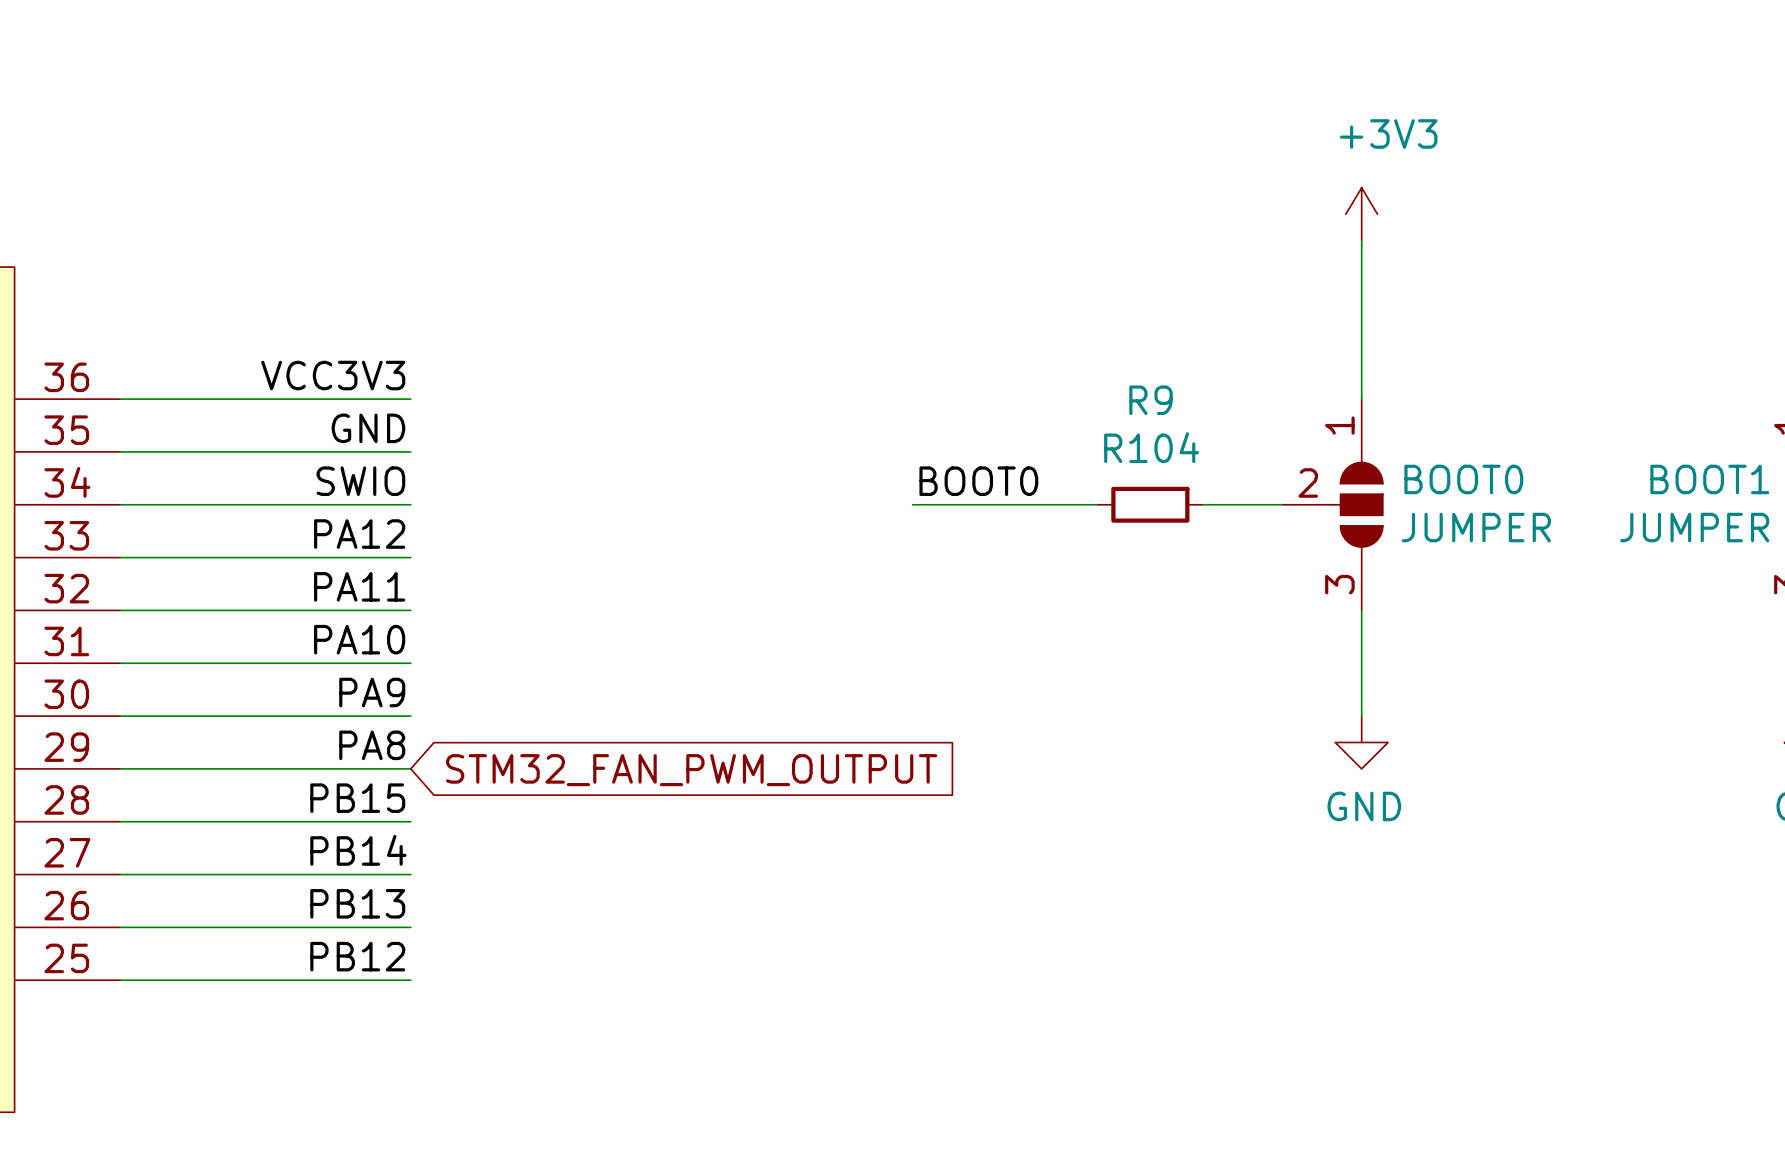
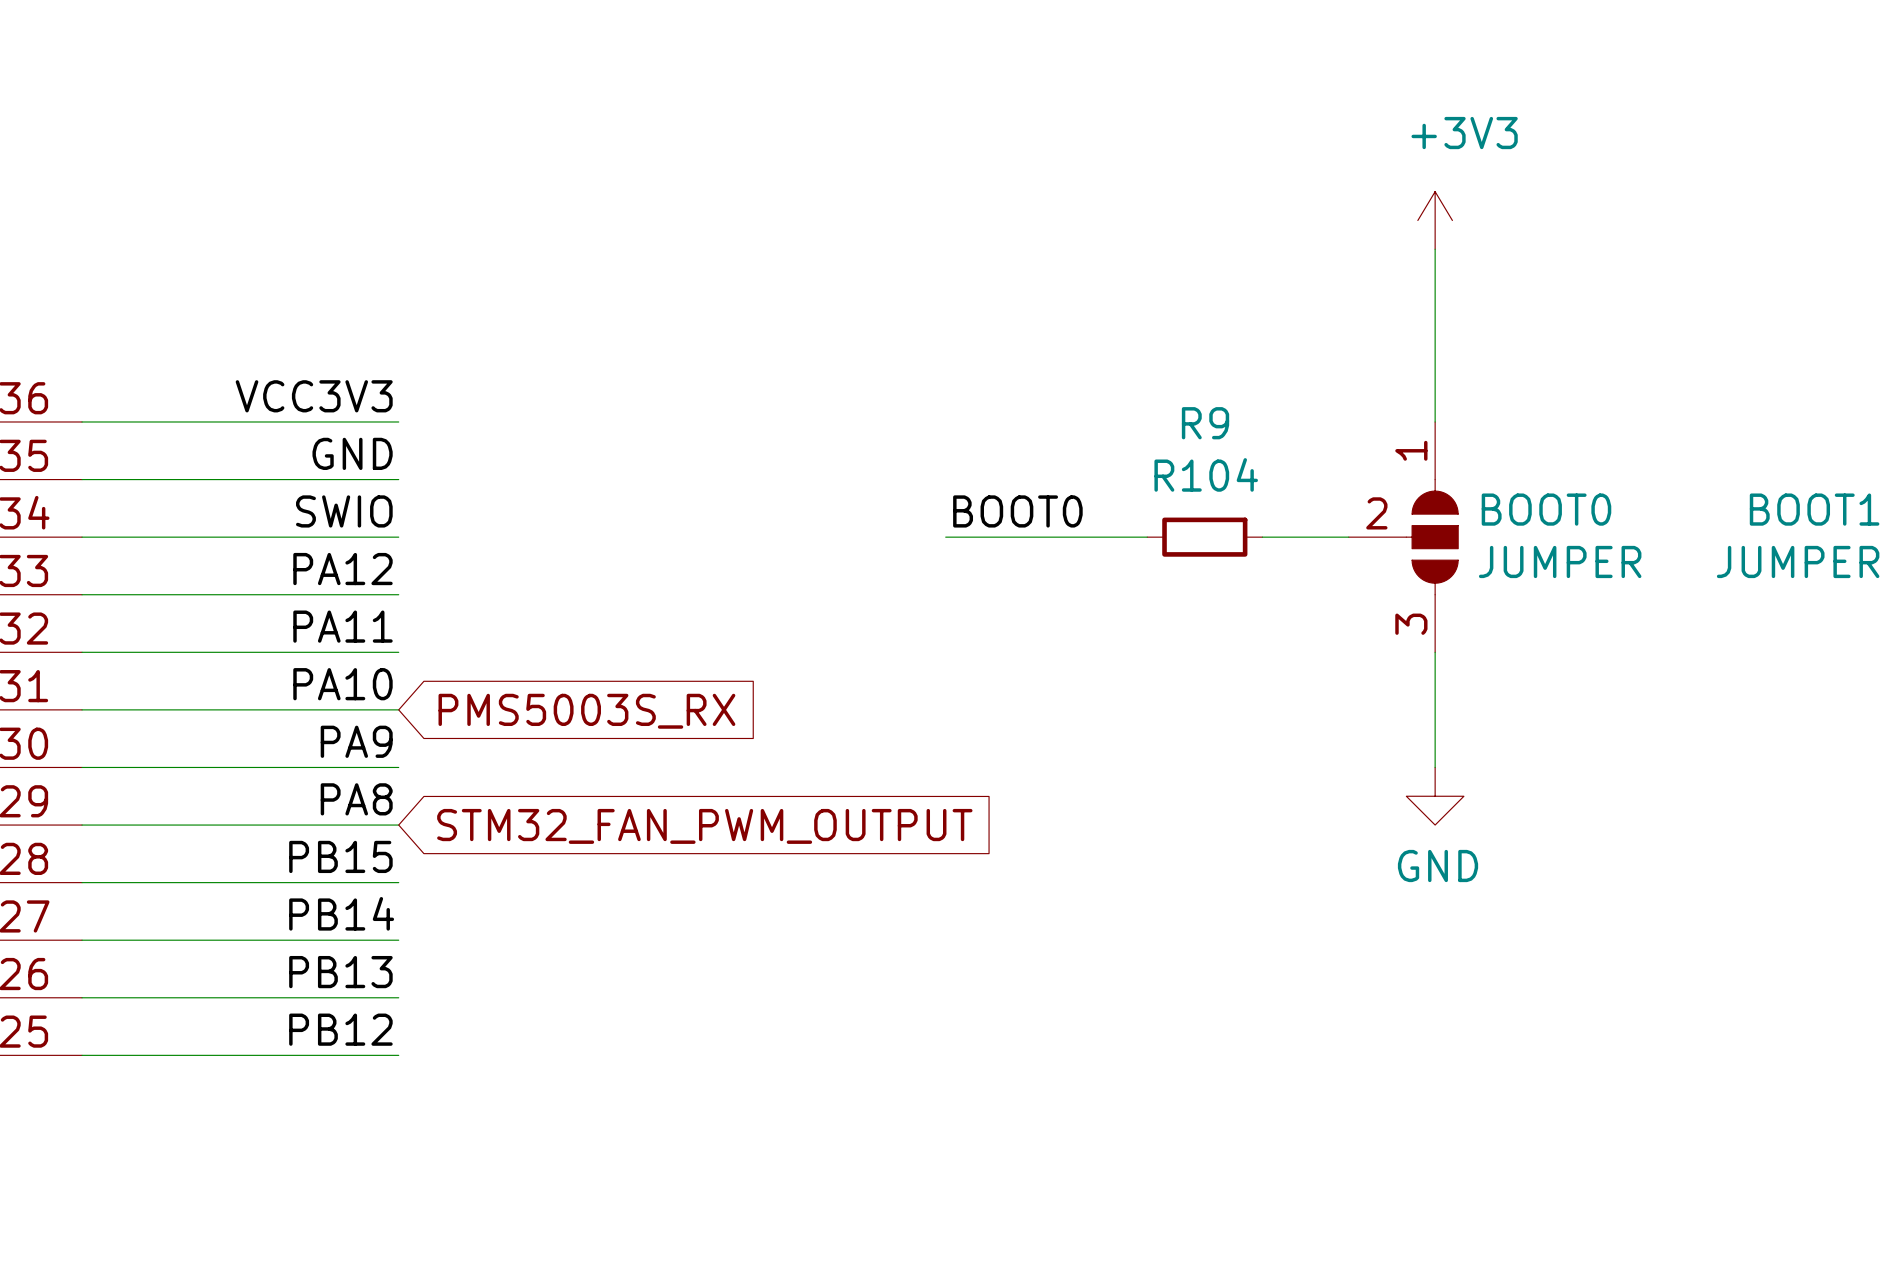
global label: none -> PMS5003S_RX (586, 711)

